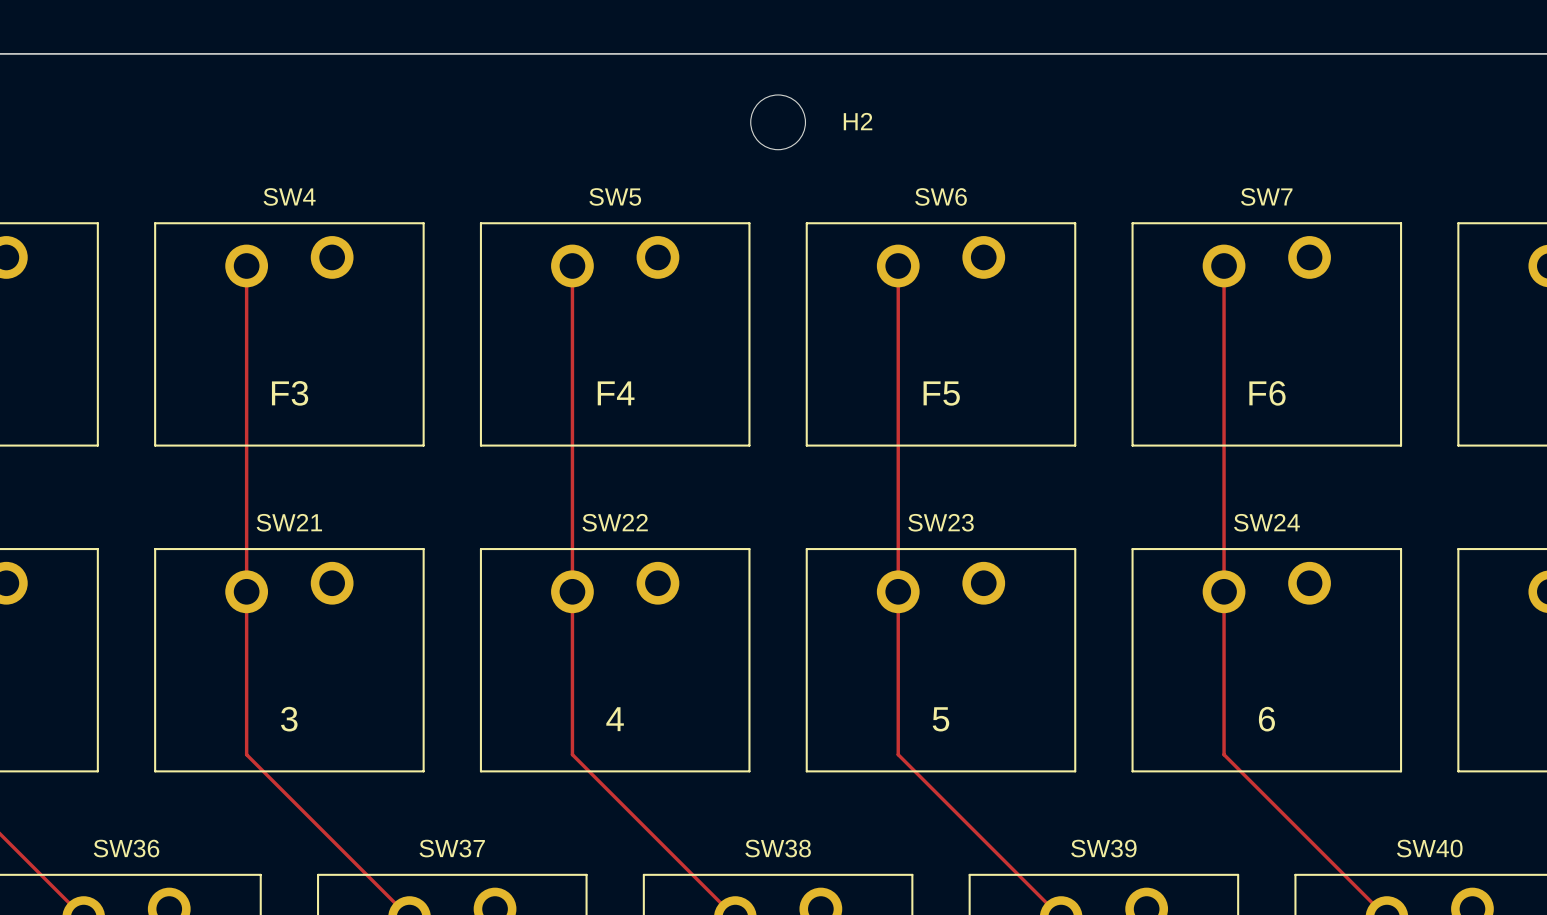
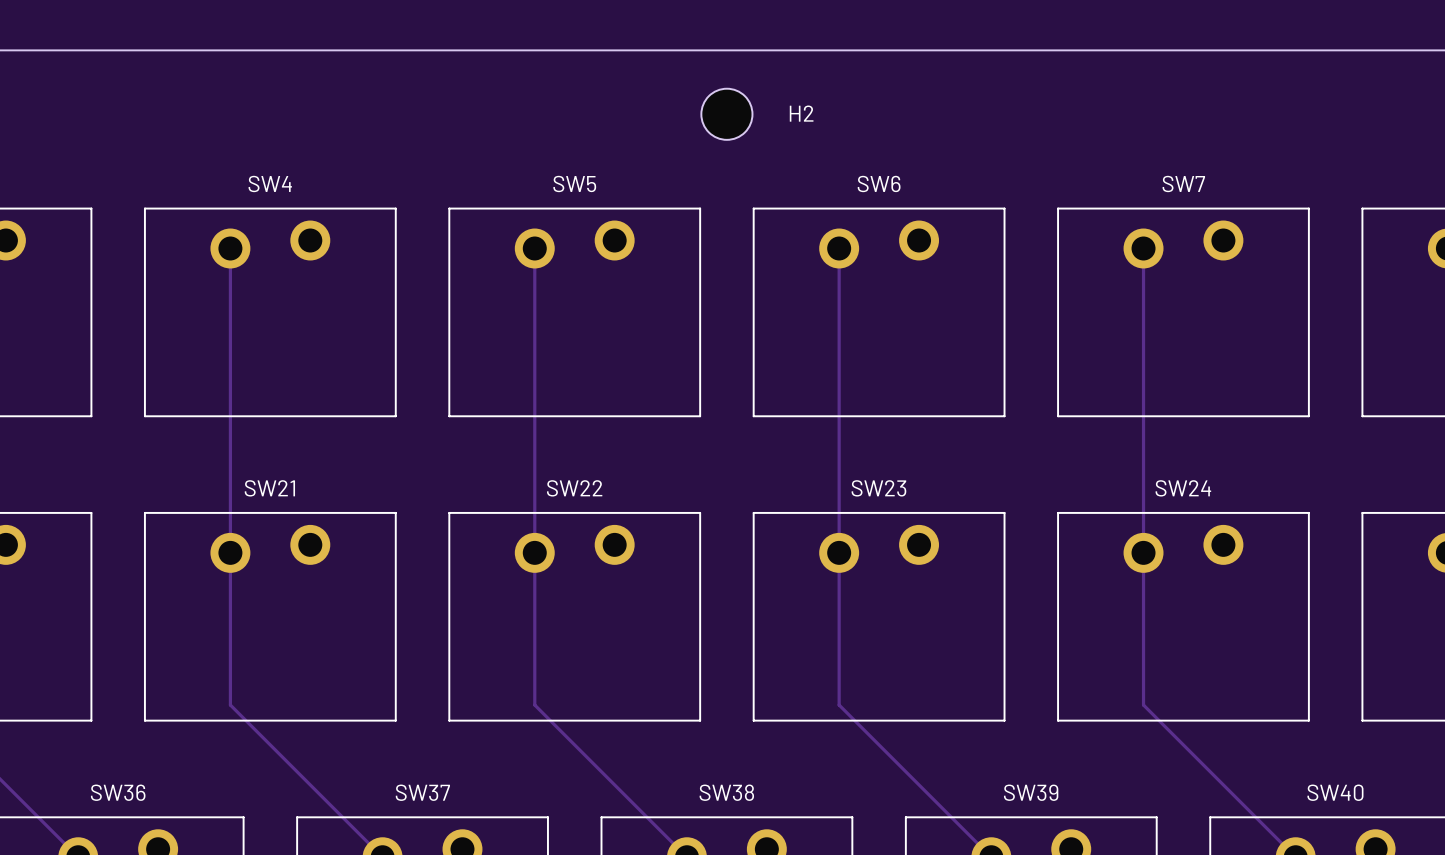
text: F3 (290, 393) -> none
text: F4 (616, 393) -> none
text: F5 (941, 393) -> none
text: F6 (1267, 393) -> none
text: 3 (289, 719) -> none
text: 4 (615, 719) -> none
text: 5 (940, 719) -> none
text: 6 (1266, 719) -> none

